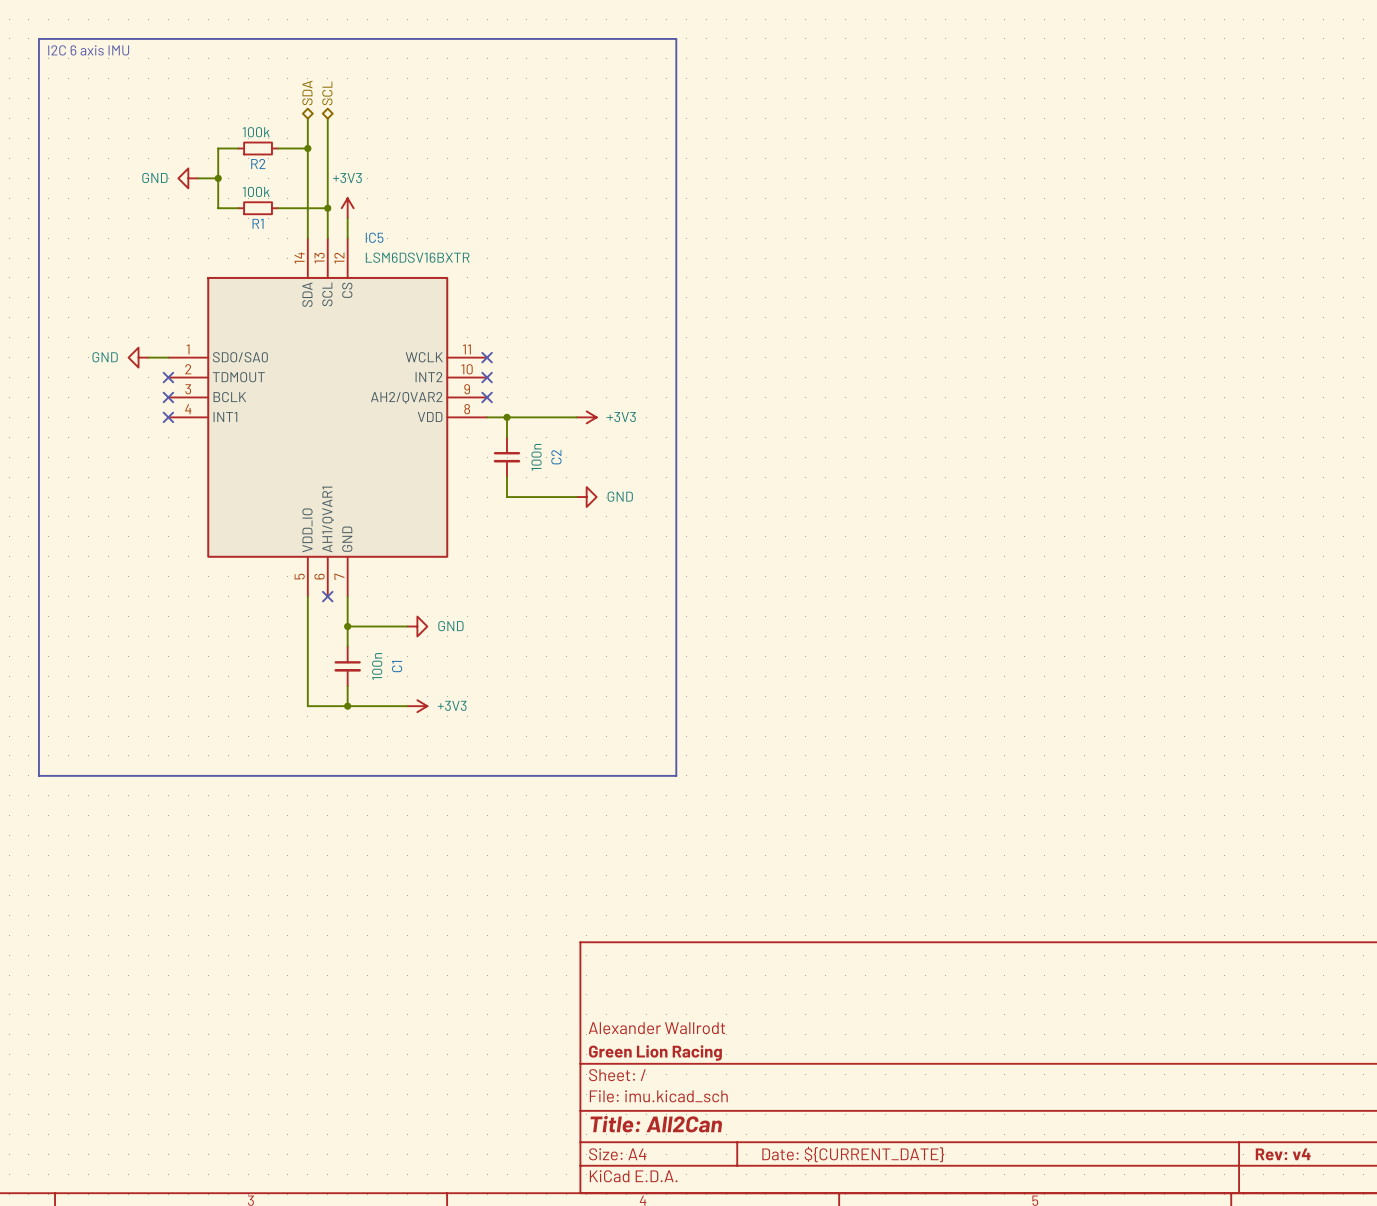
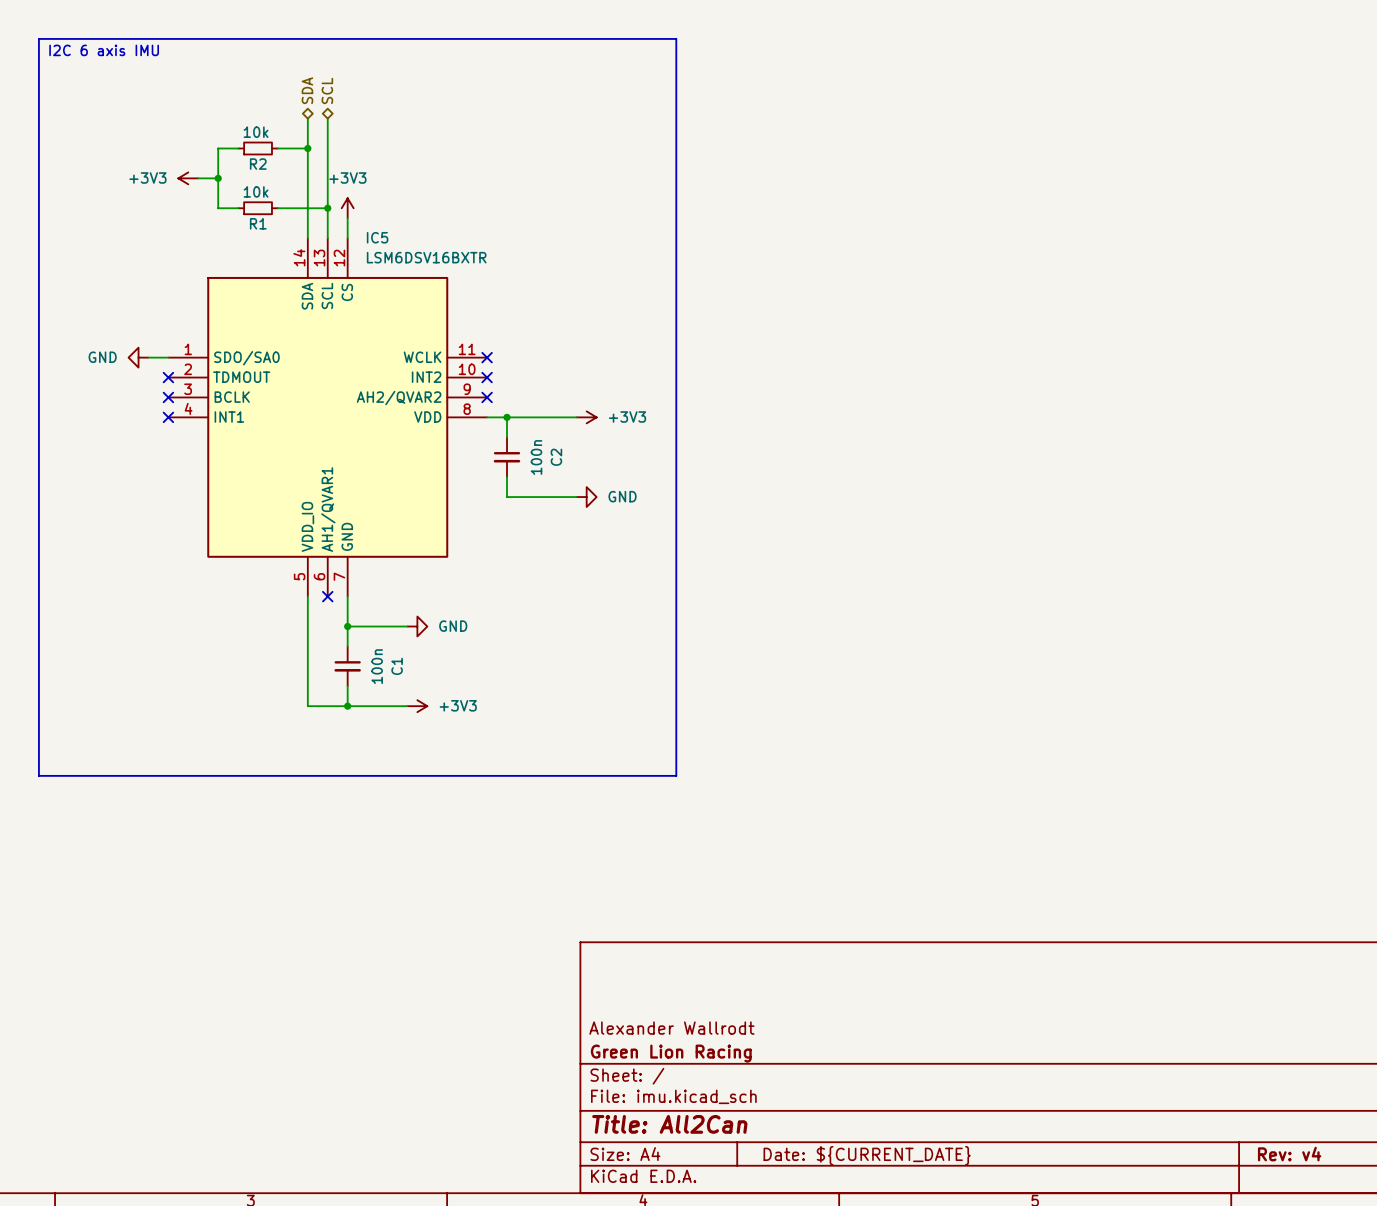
R2 value: 100k (256, 132) -> 10k (256, 132)
power symbol: GND (188, 178) -> +3V3 (188, 178)
R1 value: 100k (256, 191) -> 10k (256, 191)

